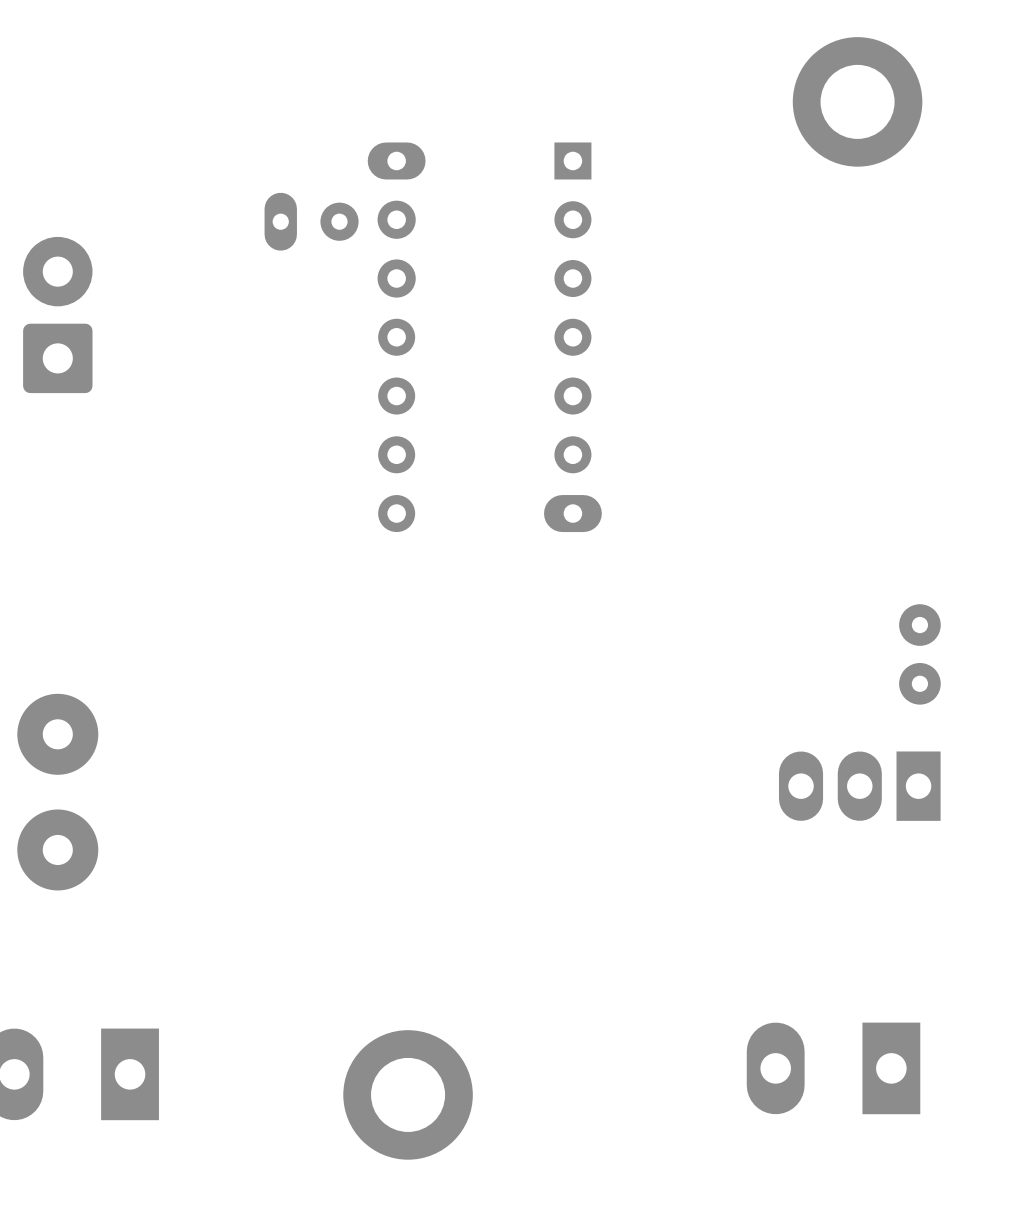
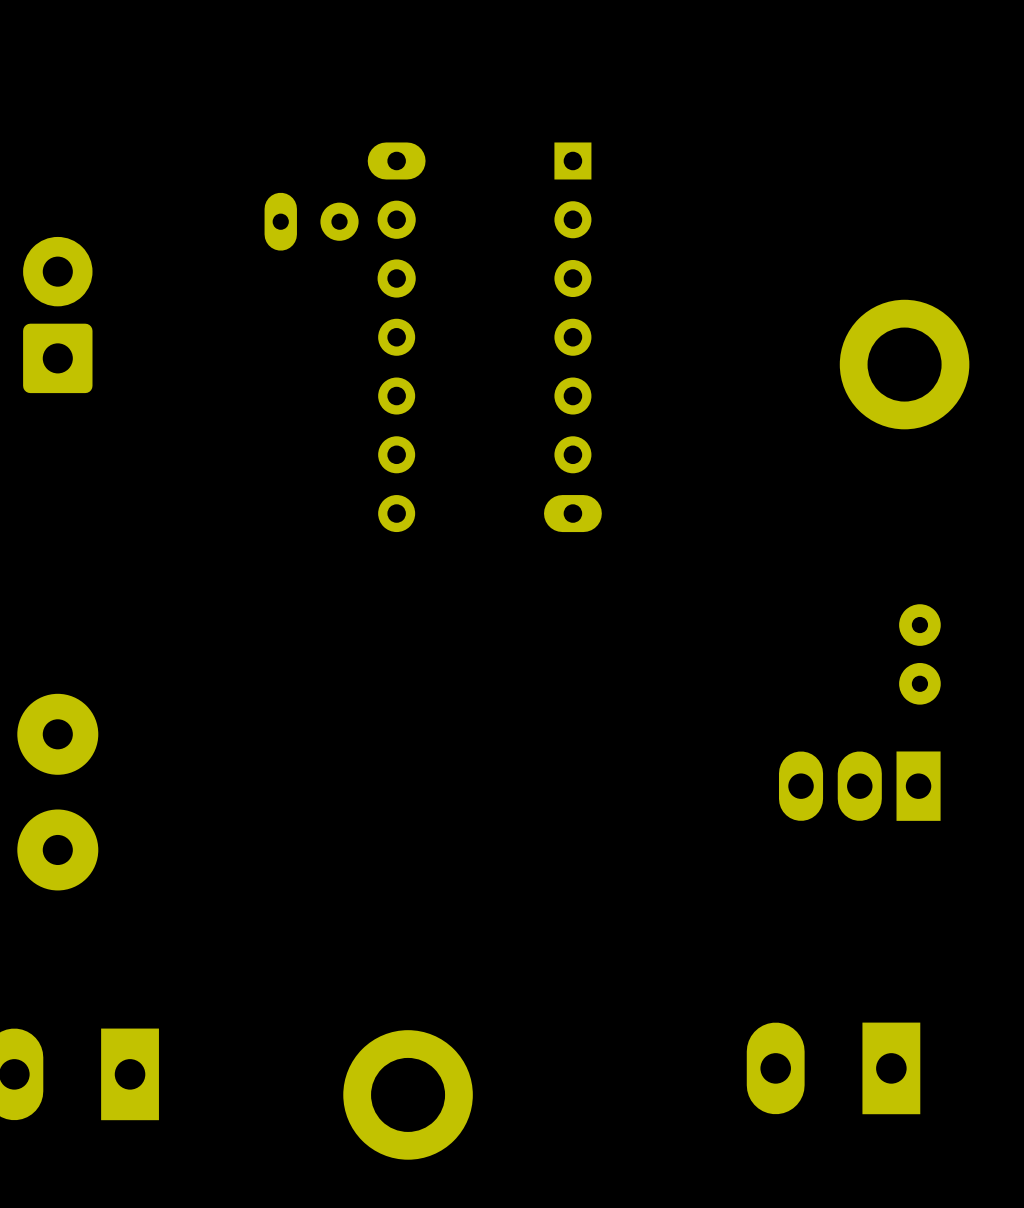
part position: (857, 101) -> (904, 364)

